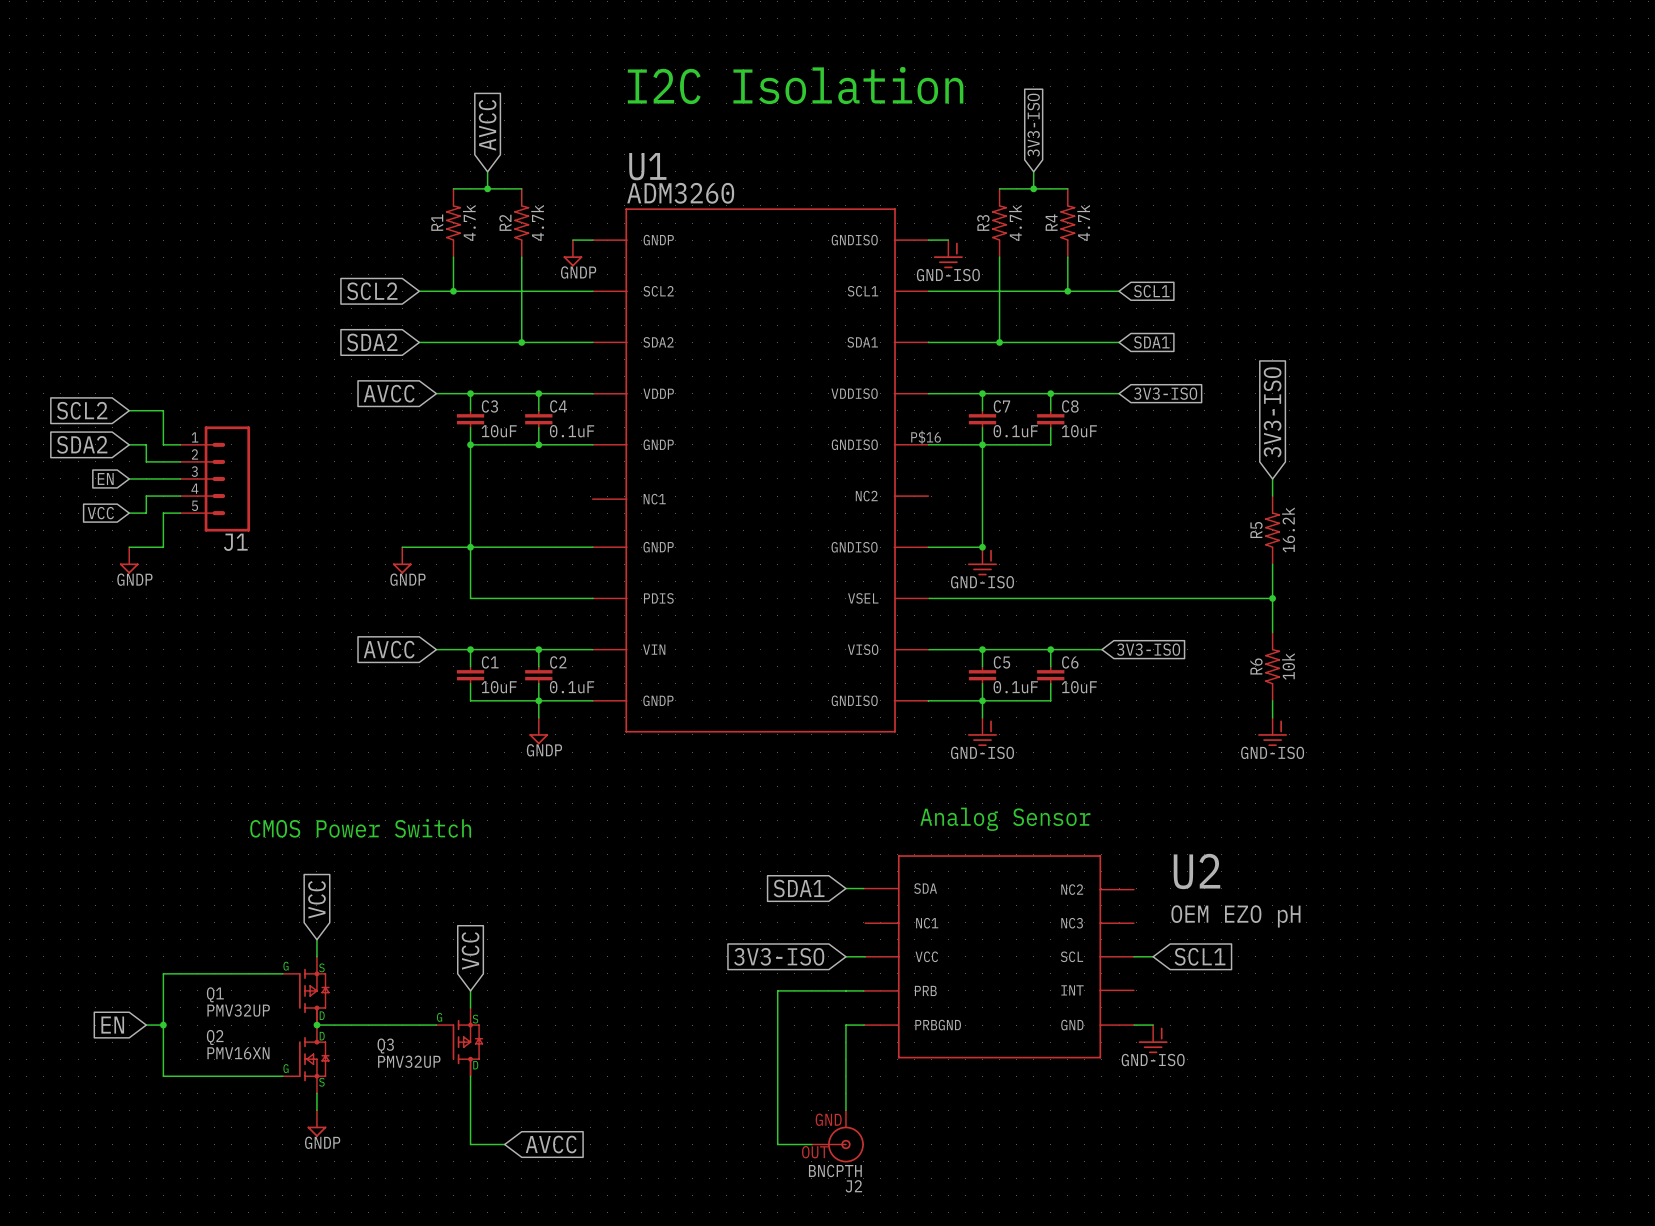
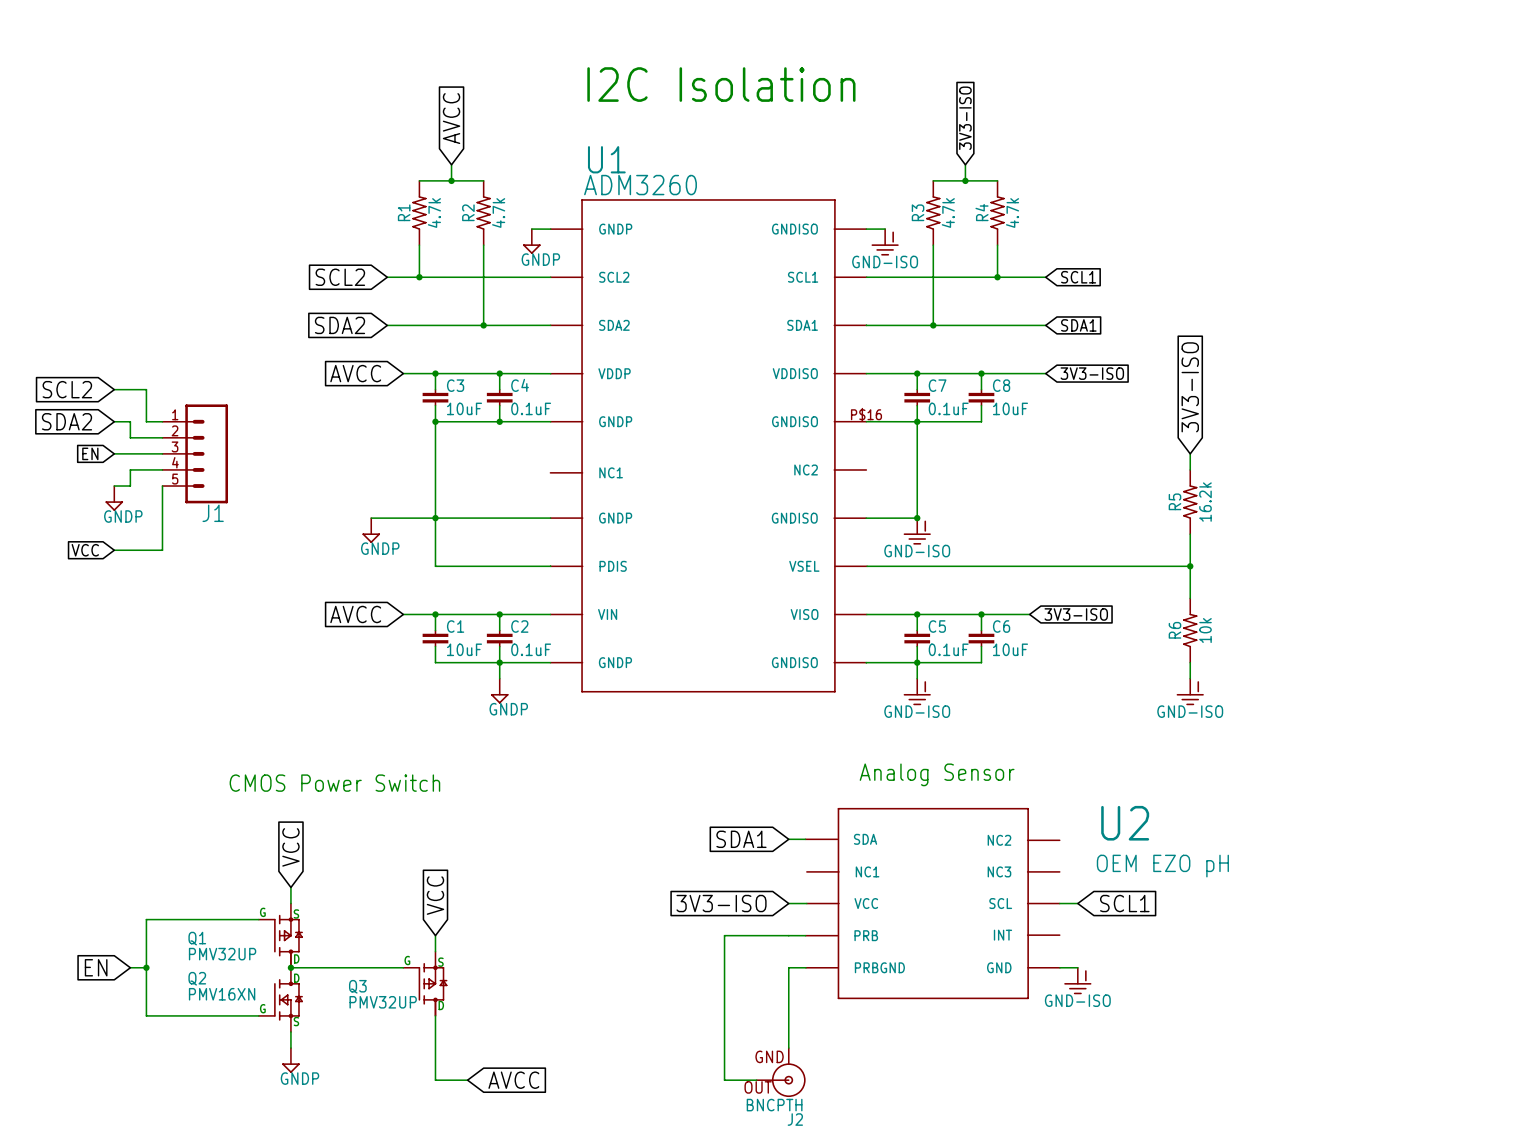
global label position: VCC (100, 513) -> VCC (85, 550)
wire: (180, 513) (163, 513) (163, 547) (129, 547) -> (162, 486) (162, 550) (114, 550)
power symbol position: GNDP (129, 560) -> GNDP (114, 498)

